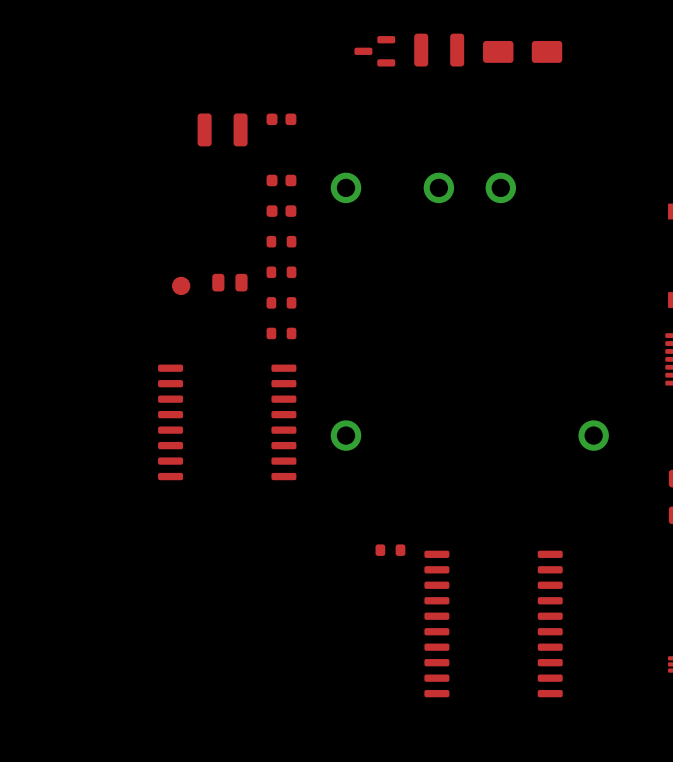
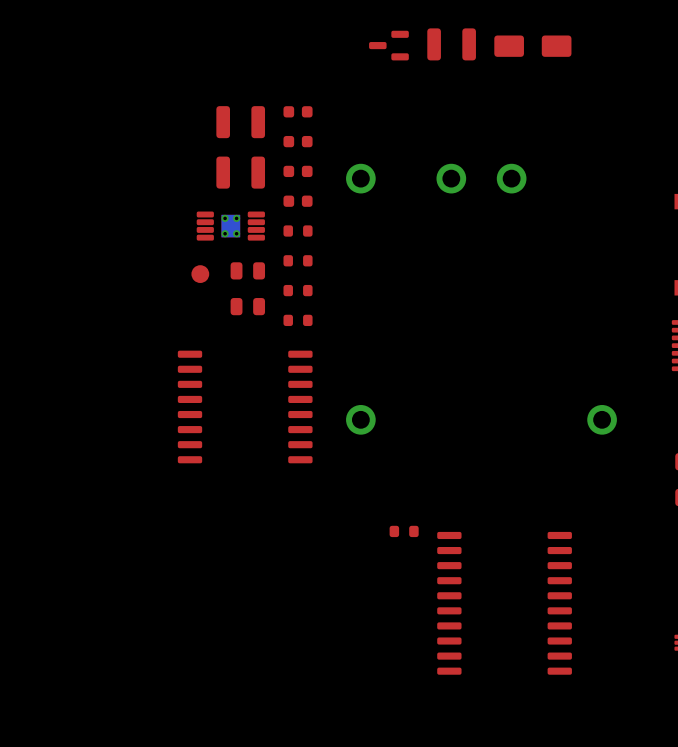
part: none -> (298, 141)
part: none -> (240, 172)
part: none -> (230, 226)
part: none -> (247, 306)

